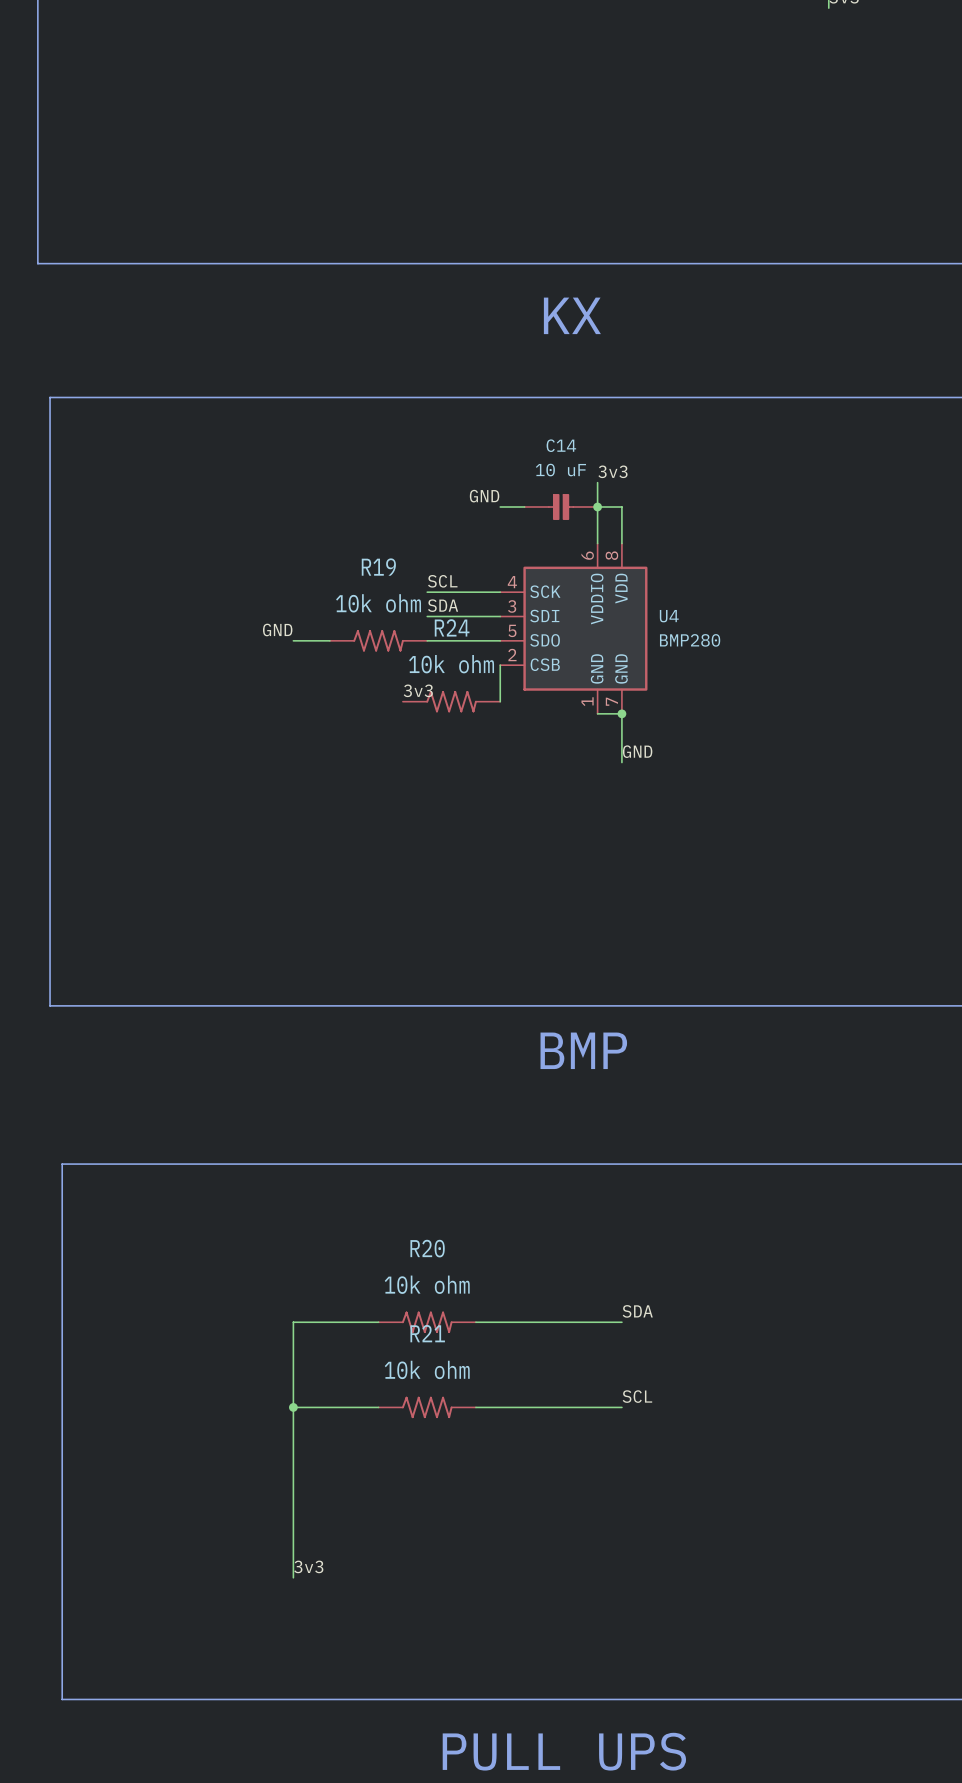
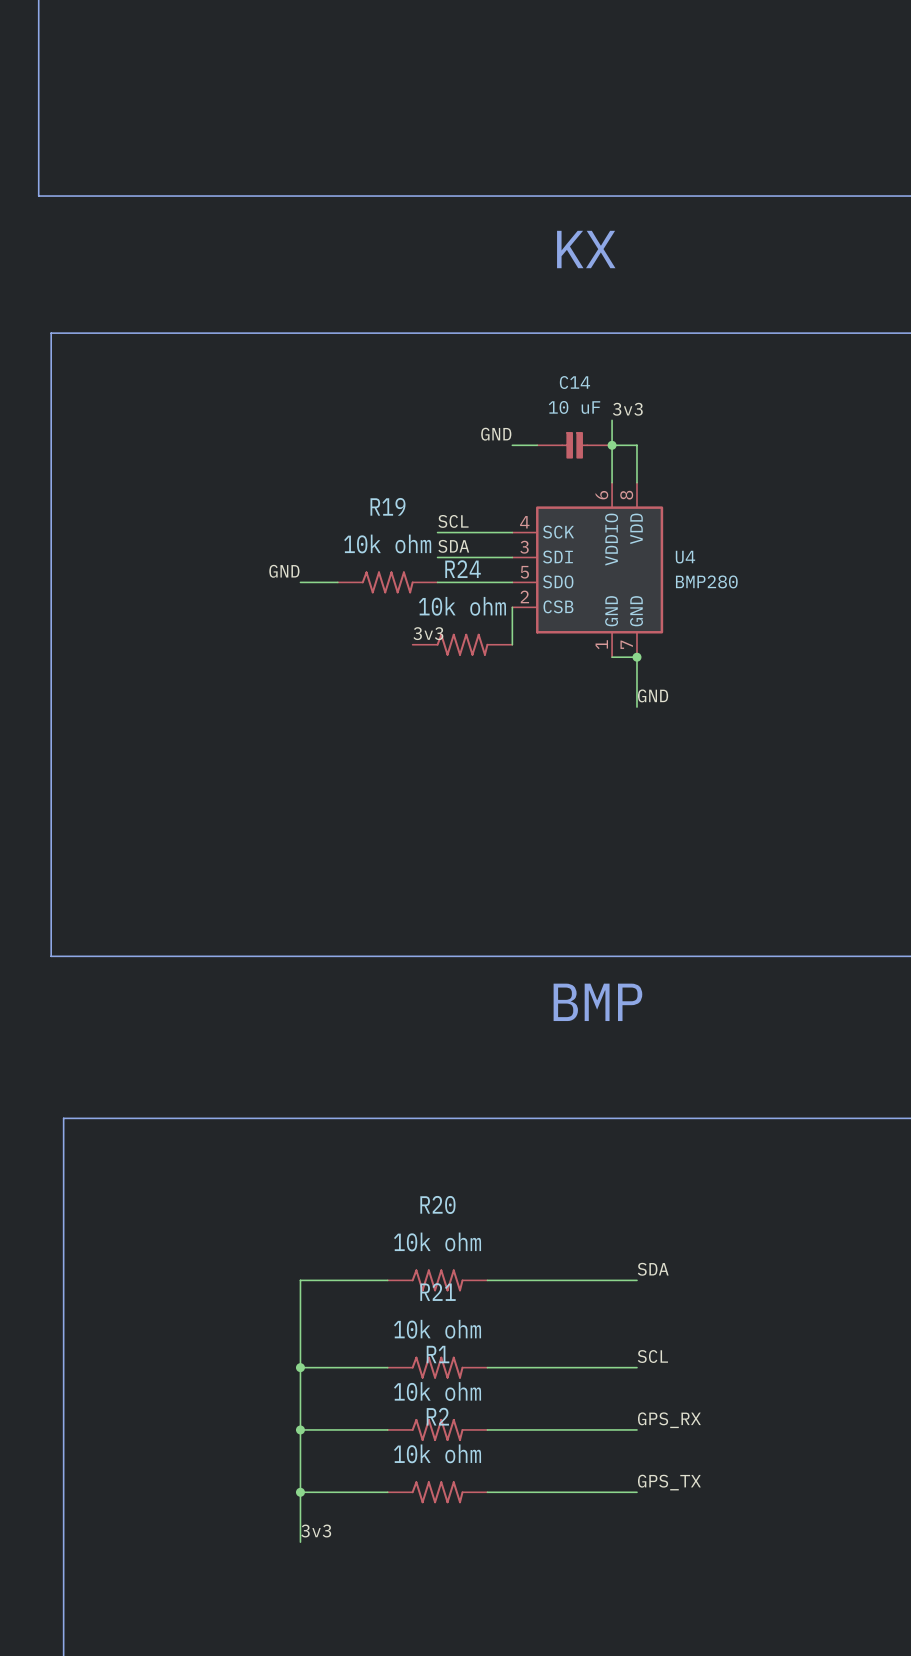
label: none -> GPS_RX (669, 1420)
wire: none -> (300, 1429) (387, 1429)
junction: none -> (300, 1429)
R1: none -> 10k ohm (437, 1429)
wire: none -> (487, 1429) (636, 1429)
label: none -> GPS_TX (669, 1482)
wire: none -> (300, 1492) (387, 1492)
junction: none -> (300, 1492)
R2: none -> 10k ohm (437, 1492)
wire: none -> (487, 1492) (636, 1492)

